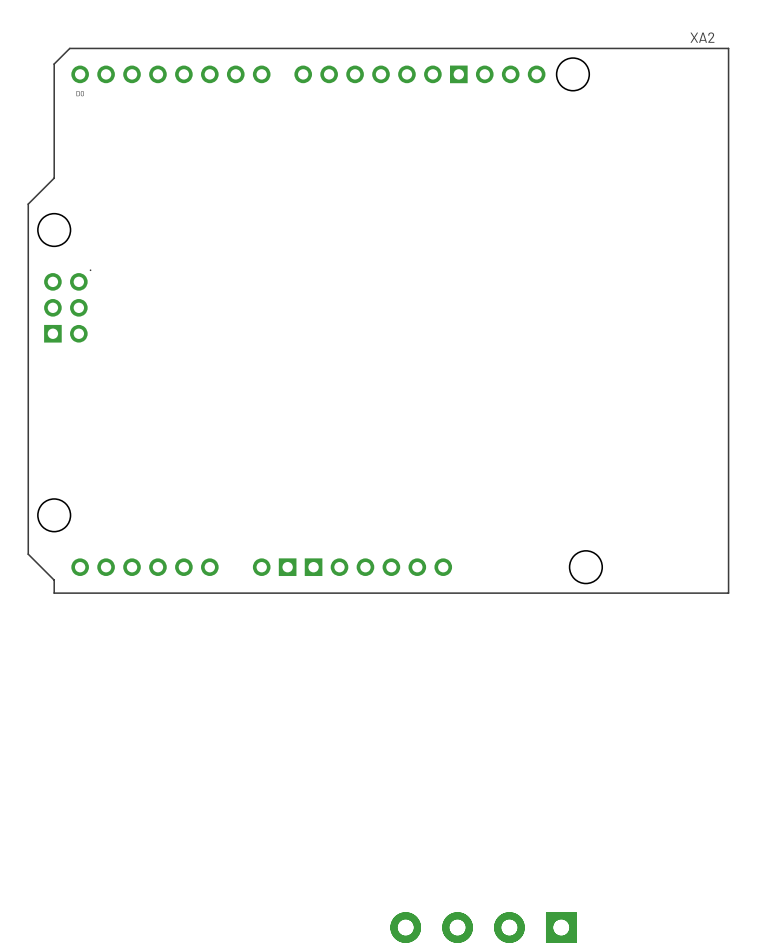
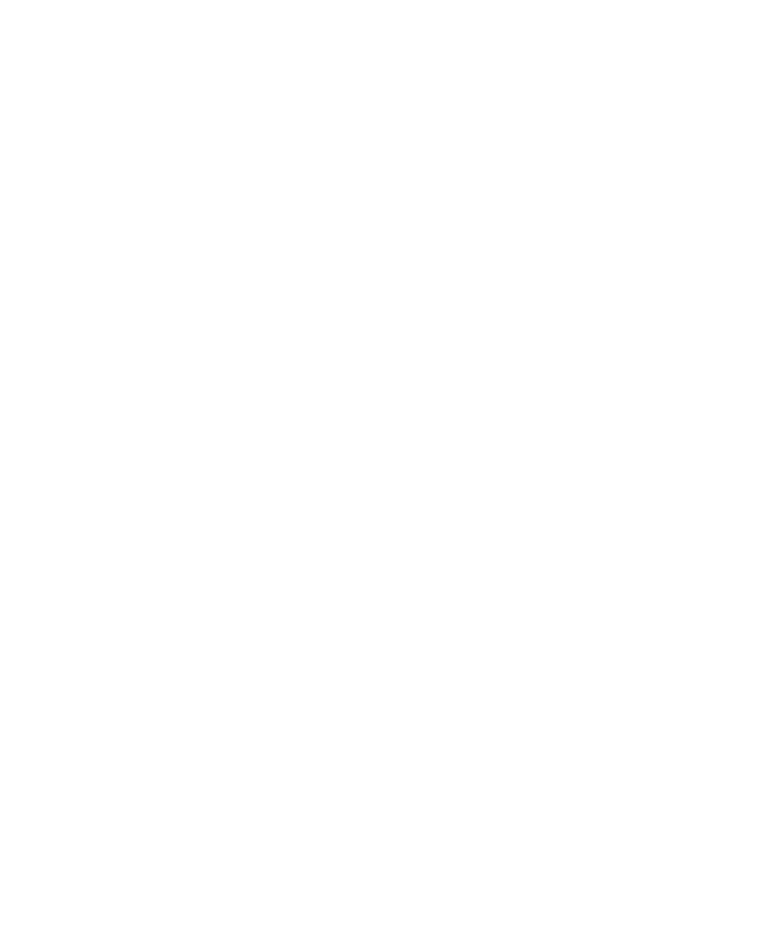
XA2: (378, 320) -> none
part: (483, 927) -> none

